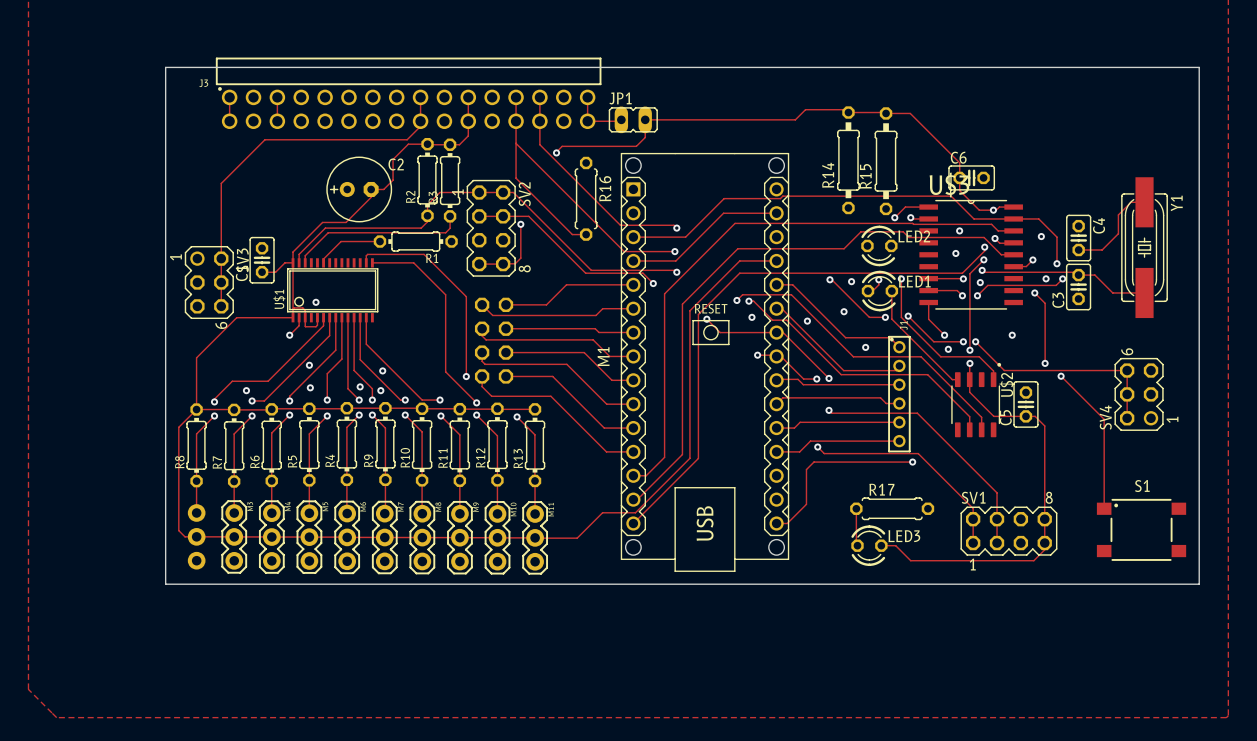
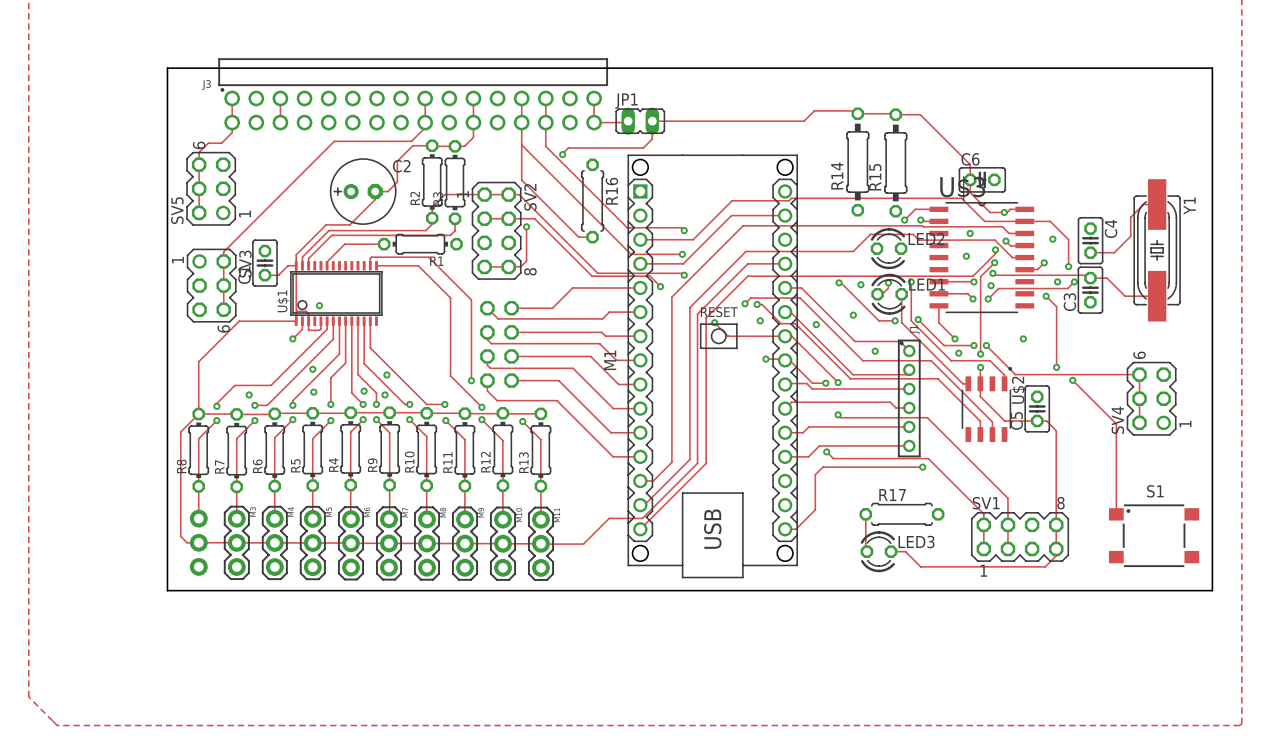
track: none -> (232, 122) (232, 132) (221, 143) (208, 143) (199, 152) (199, 212)
track: (330, 139) (264, 139) (221, 183) (221, 249) -> (334, 141) (223, 251)
SV5: none -> (211, 188)

